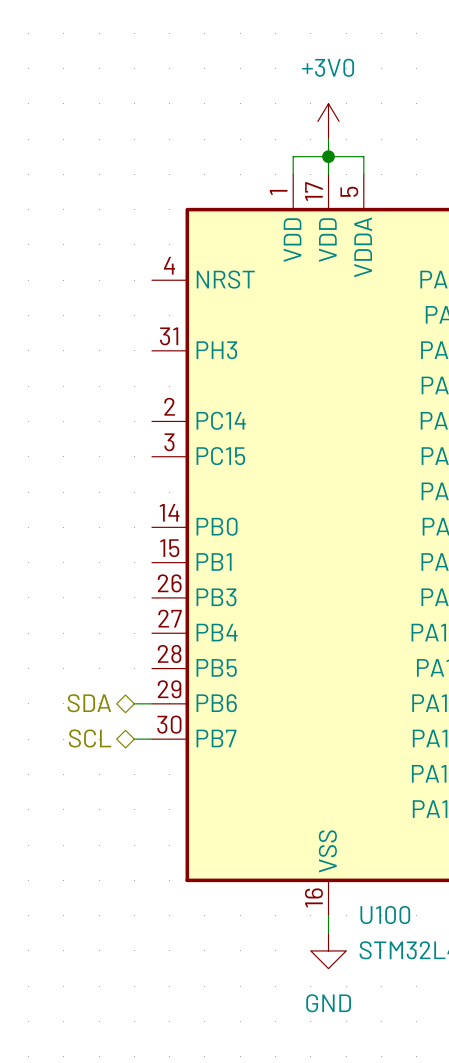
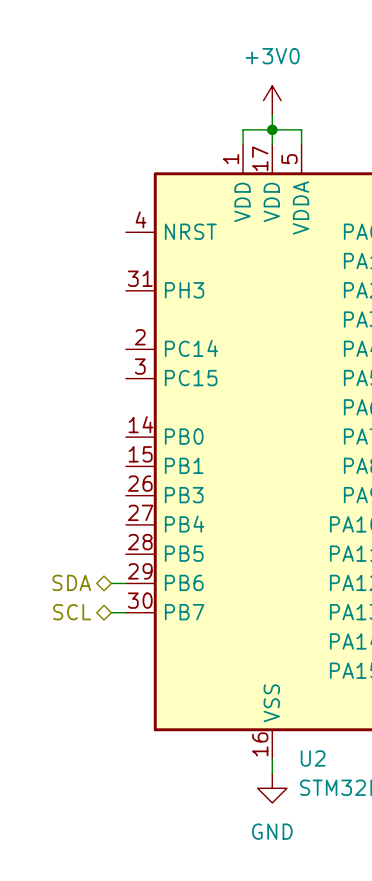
U100 name: U100 (385, 915) -> U2 (313, 758)

